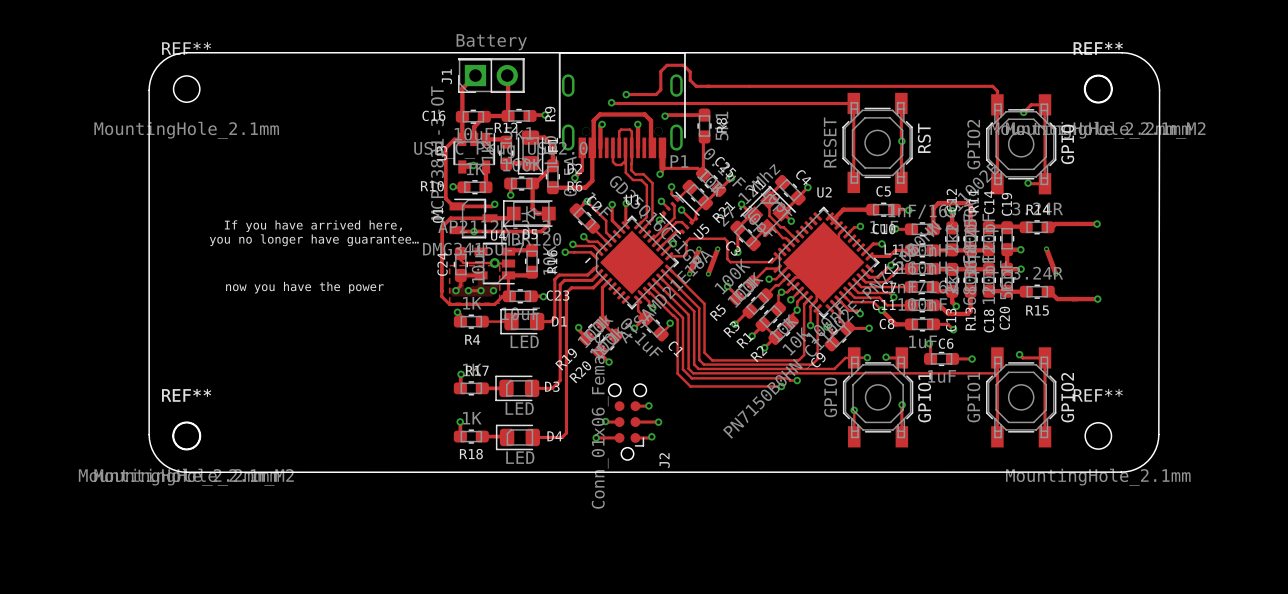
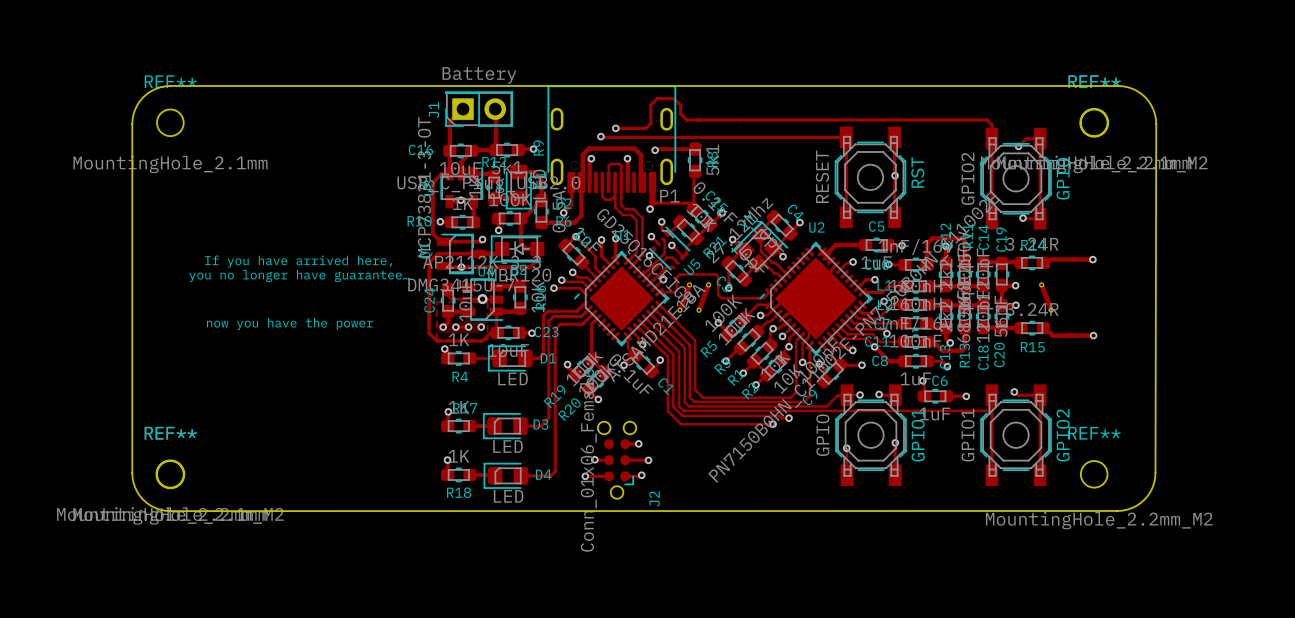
REF** value: MountingHole_2.1mm (1098, 477) -> MountingHole_2.2mm_M2 (1099, 520)

